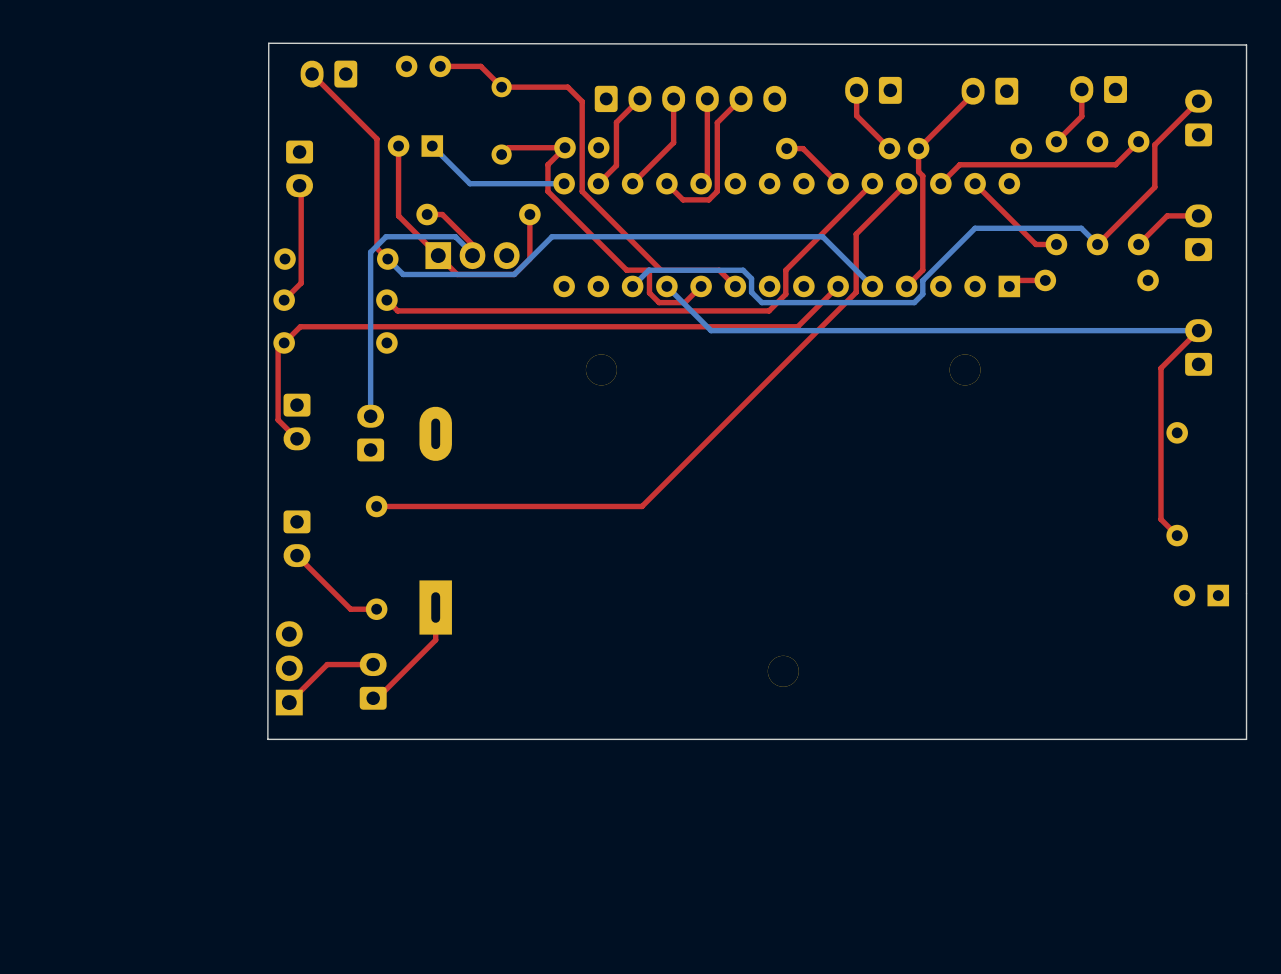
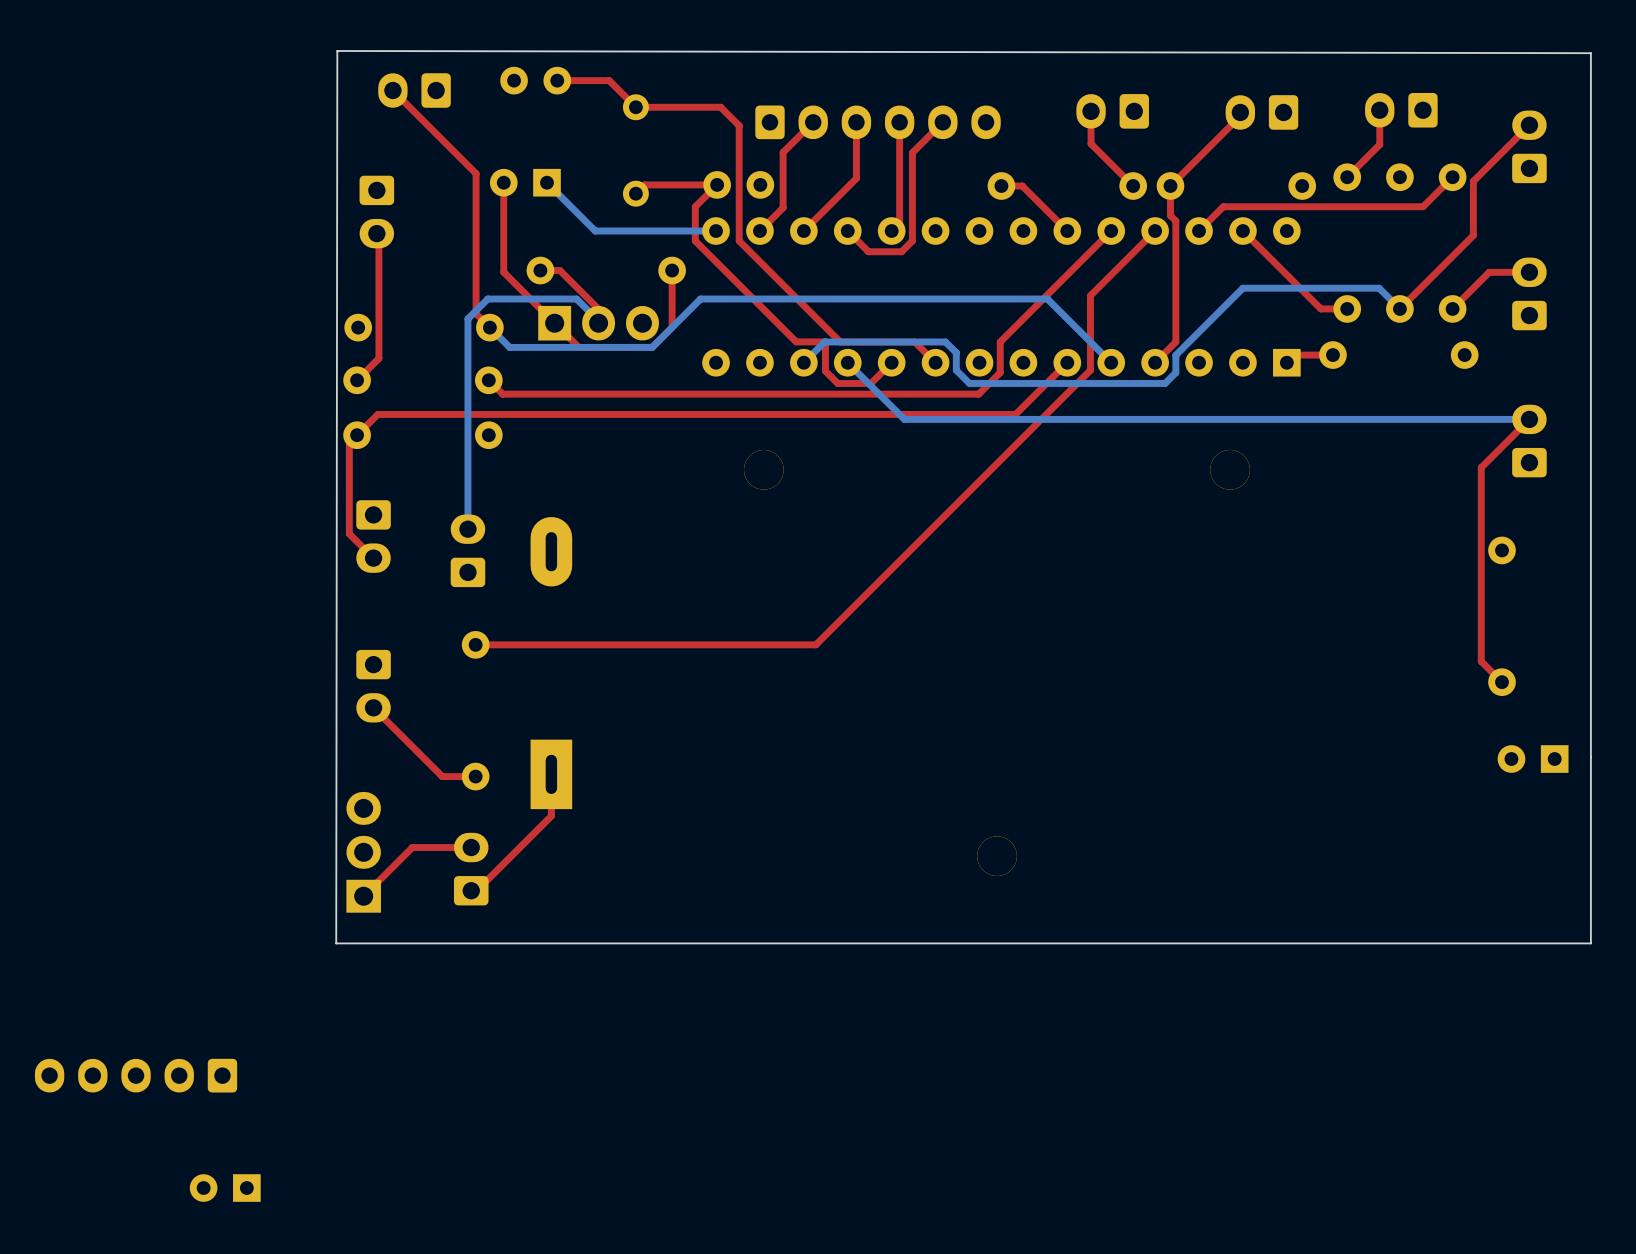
part: none -> (136, 1075)
part: none -> (225, 1188)

